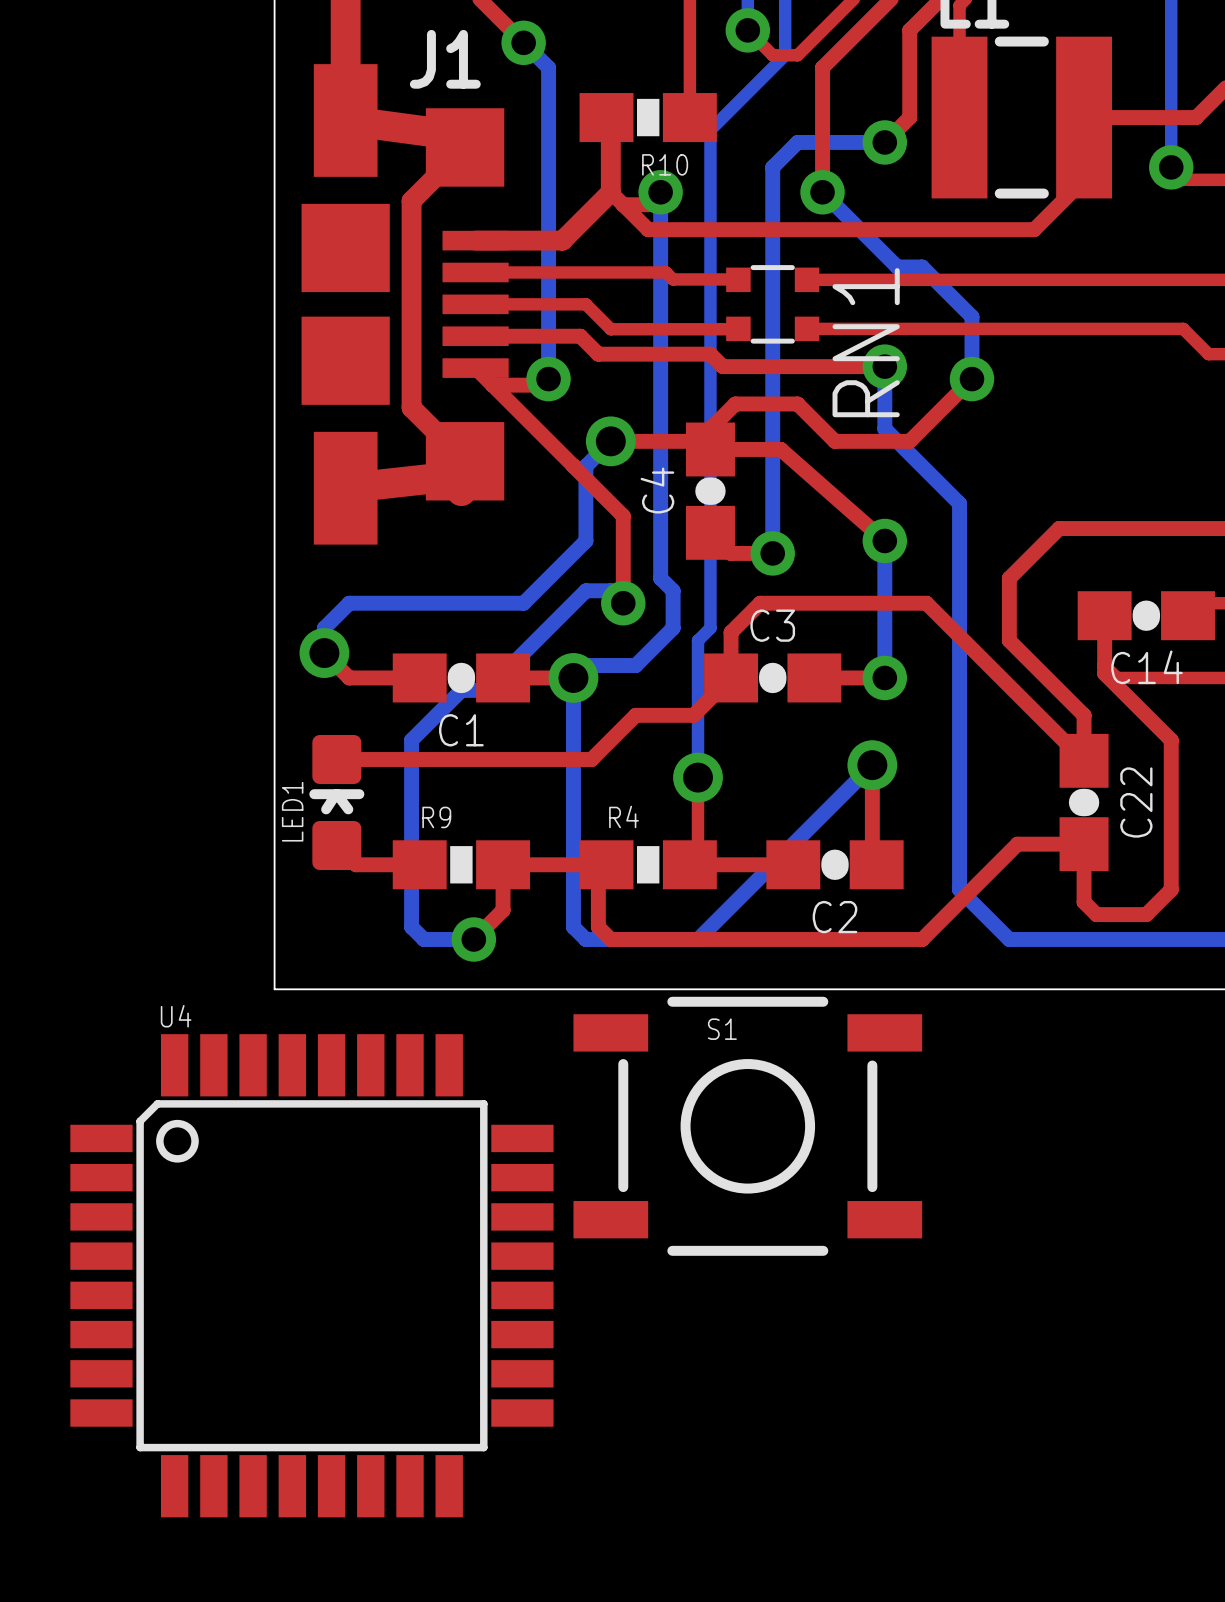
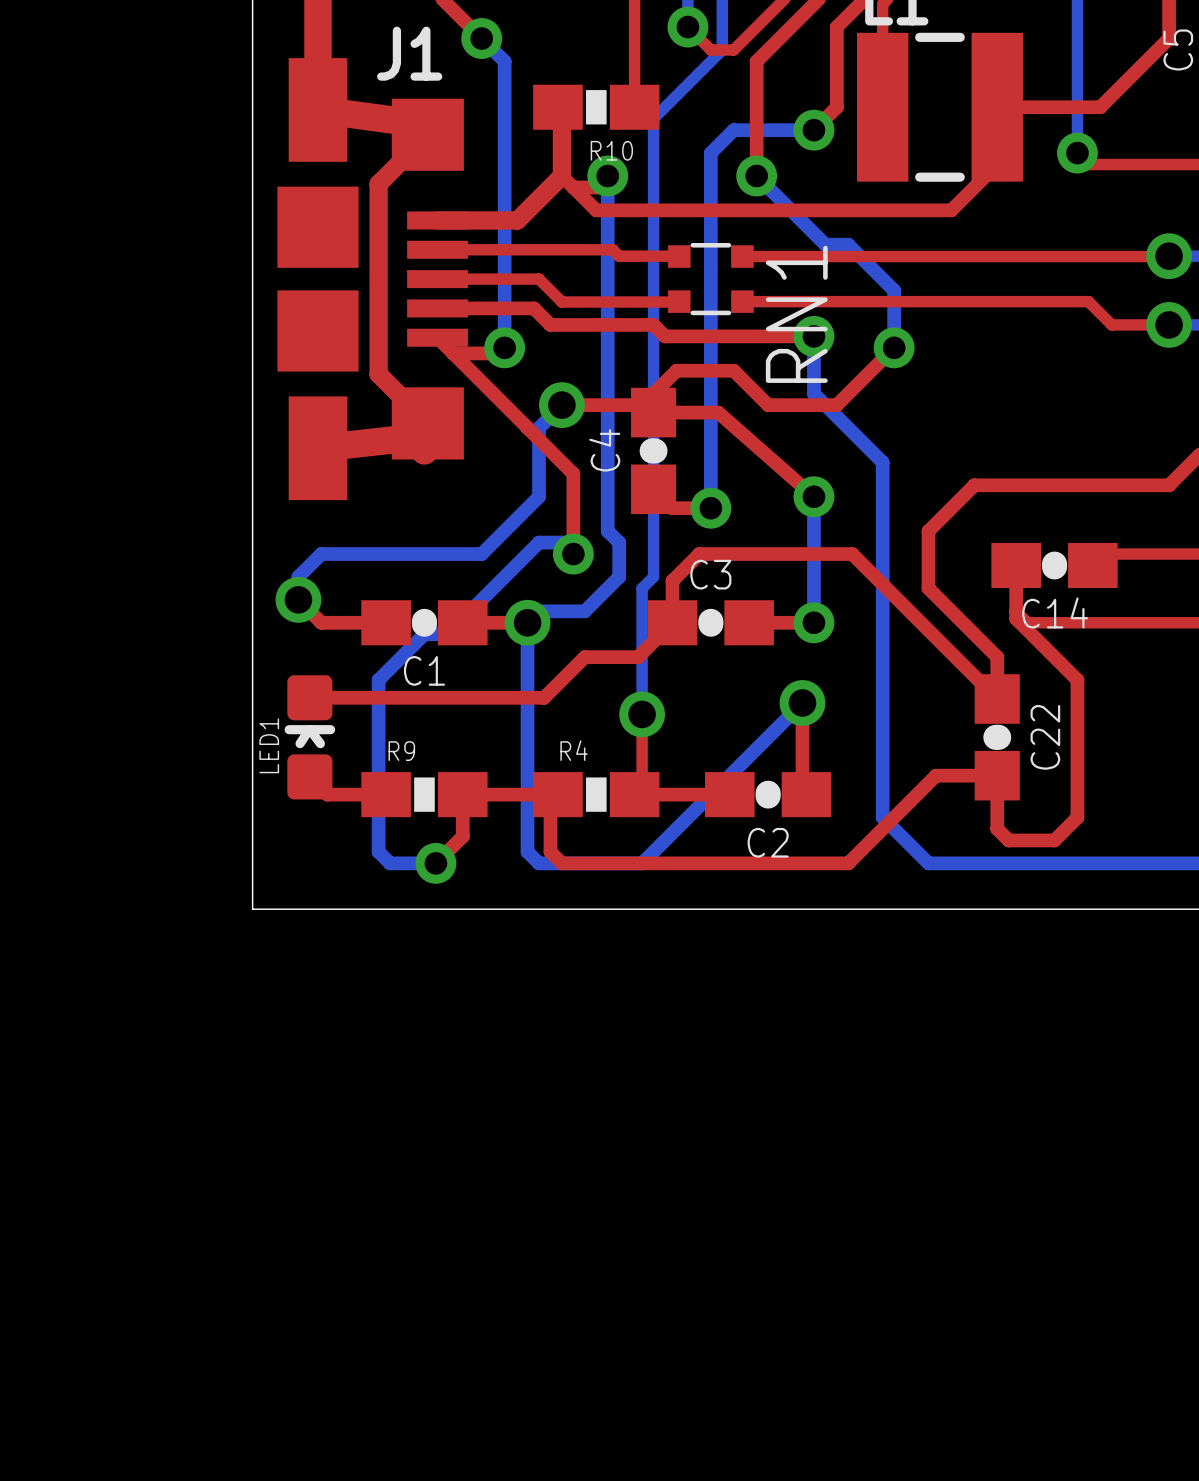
S1: (747, 1126) -> none
U4: (311, 1275) -> none

